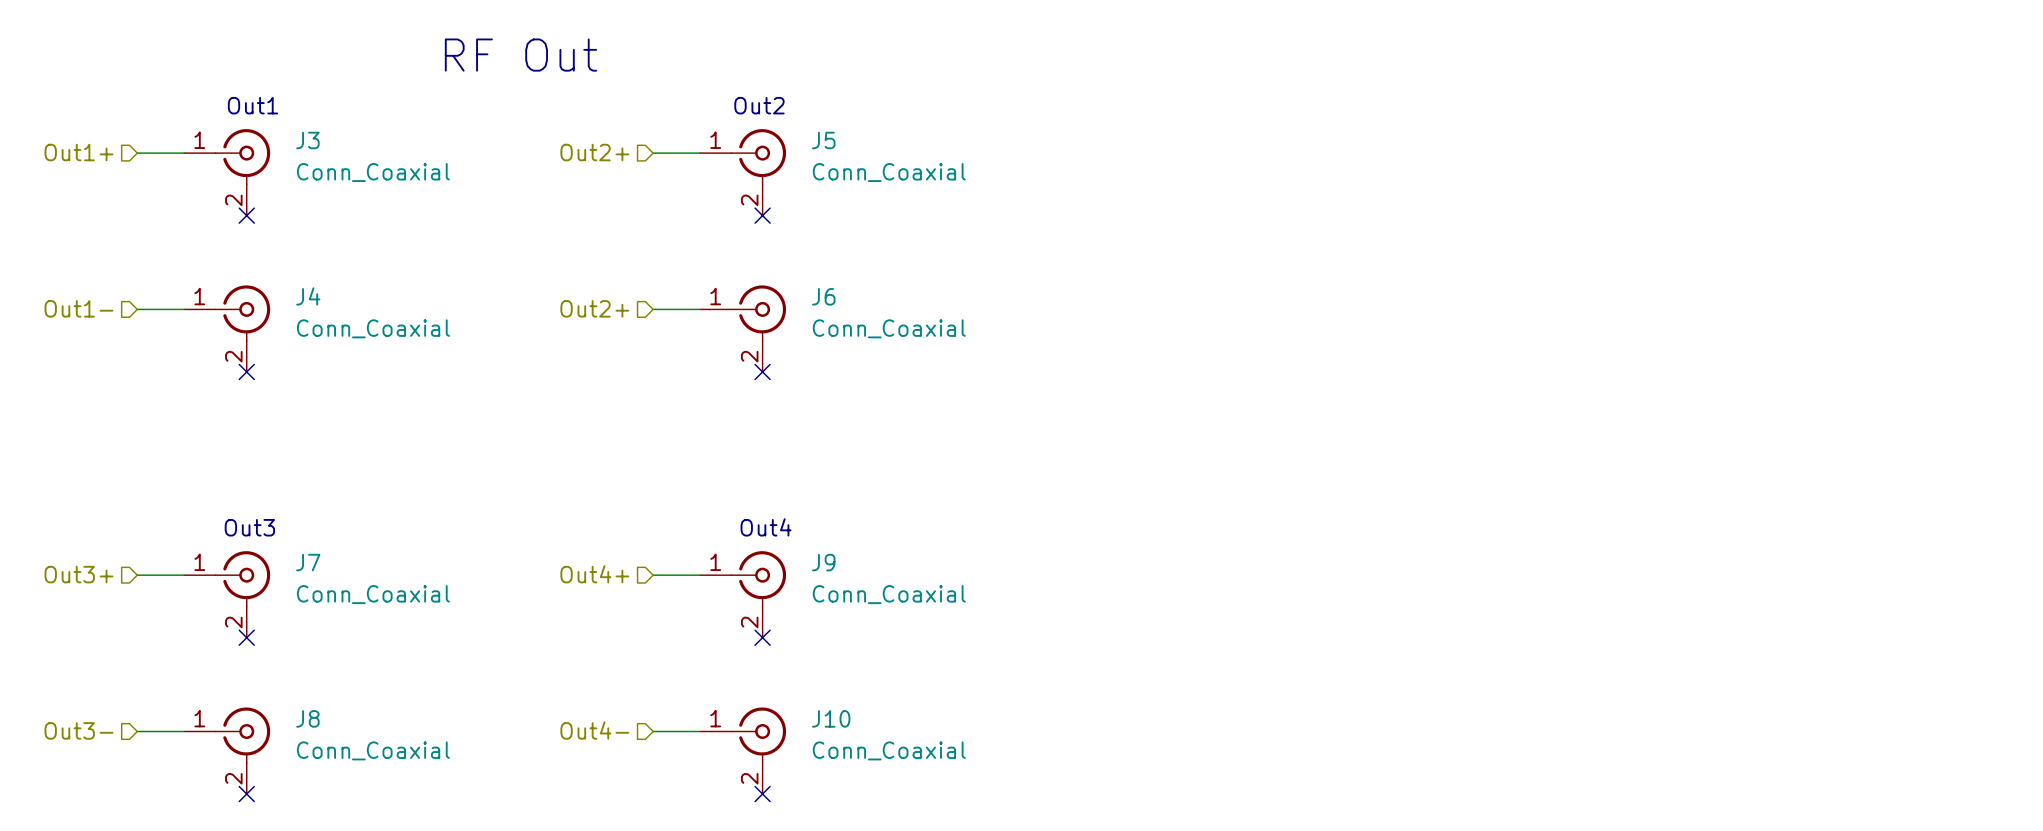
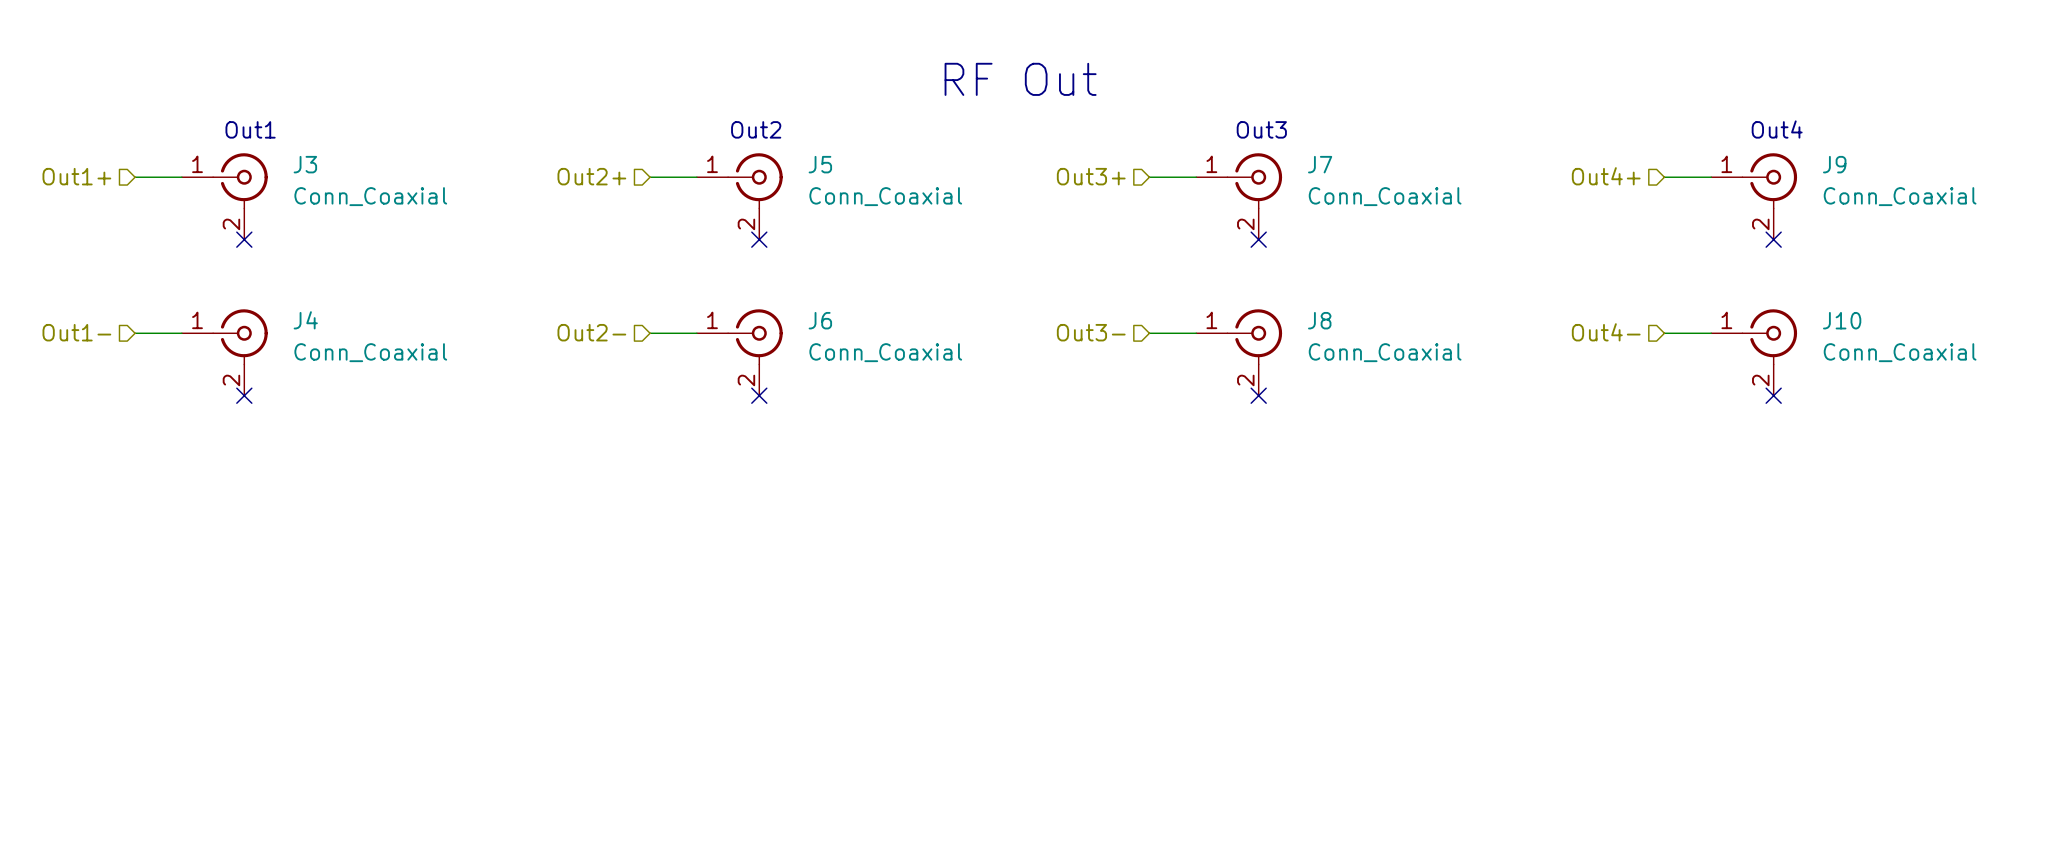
text: RF Out (520, 55) -> none
text: none -> RF Out (1020, 79)
text: none -> Out3 (1261, 129)
text: none -> Out4 (1777, 129)
hierarchical label: none -> Out3+ (1091, 176)
hierarchical label: none -> Out4+ (1606, 176)
wire: none -> (1149, 177) (1196, 177)
wire: none -> (1664, 177) (1711, 177)
no-connect mark: none -> (1258, 239)
no-connect mark: none -> (1773, 239)
hierarchical label: Out2+ (594, 308) -> Out2- (591, 332)
hierarchical label: none -> Out3- (1091, 332)
hierarchical label: none -> Out4- (1606, 332)
wire: none -> (1149, 333) (1196, 333)
wire: none -> (1664, 333) (1711, 333)
no-connect mark: none -> (1258, 395)
no-connect mark: none -> (1773, 395)
text: Out3 (249, 527) -> none
text: Out4 (766, 527) -> none
hierarchical label: Out3+ (78, 574) -> none
hierarchical label: Out4+ (594, 574) -> none
wire: (137, 575) (184, 575) -> none
wire: (653, 575) (700, 575) -> none
J7 position: (227, 594) -> (1239, 196)
J9 position: (743, 594) -> (1754, 196)
no-connect mark: (246, 637) -> none
no-connect mark: (762, 637) -> none
hierarchical label: Out3- (78, 730) -> none
hierarchical label: Out4- (594, 730) -> none
wire: (137, 731) (184, 731) -> none
wire: (653, 731) (700, 731) -> none
J8 position: (227, 750) -> (1239, 352)
J10 position: (743, 750) -> (1754, 352)
no-connect mark: (246, 794) -> none
no-connect mark: (762, 794) -> none

